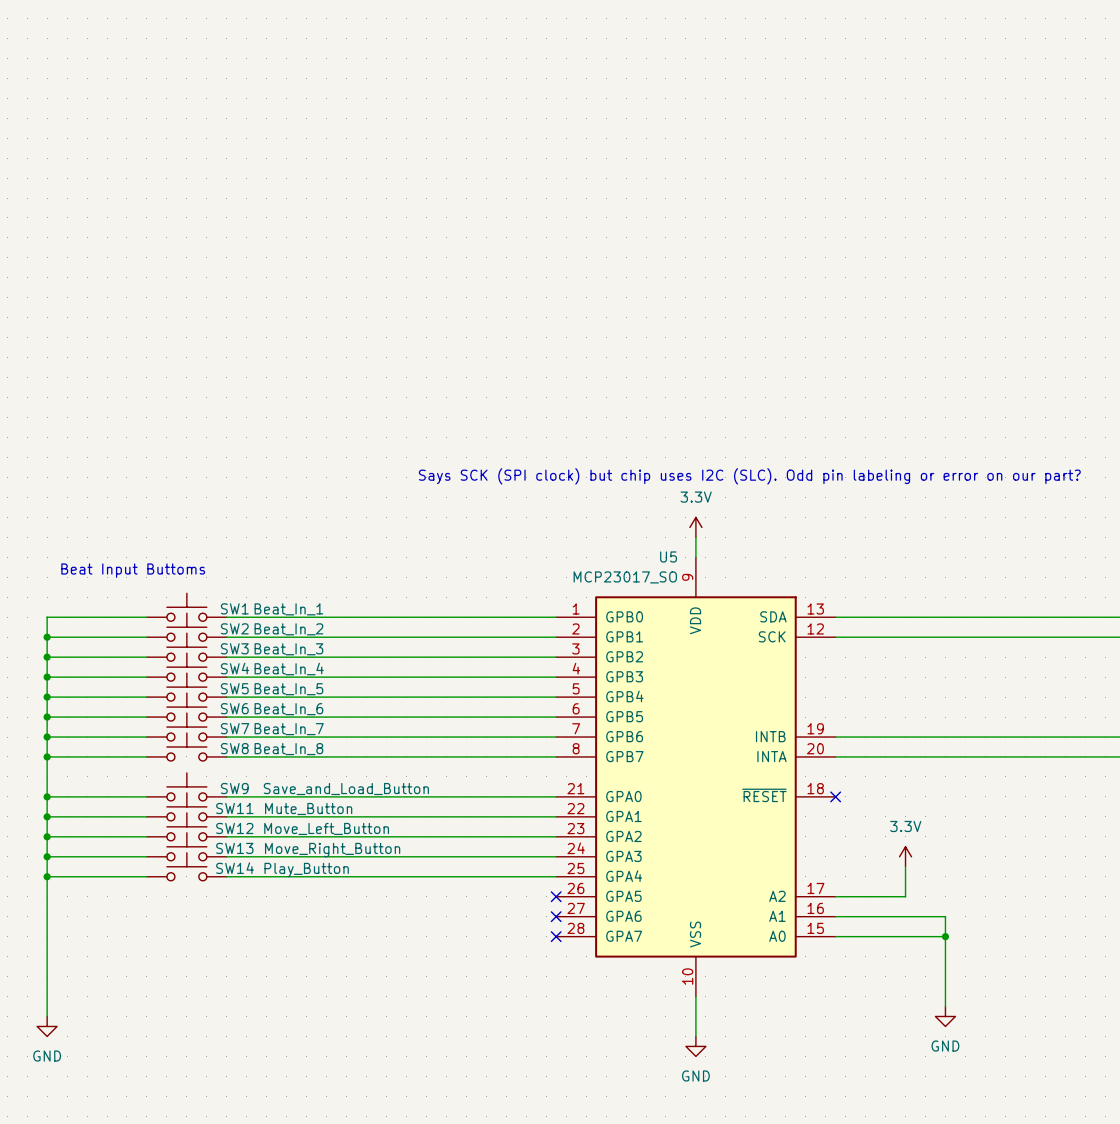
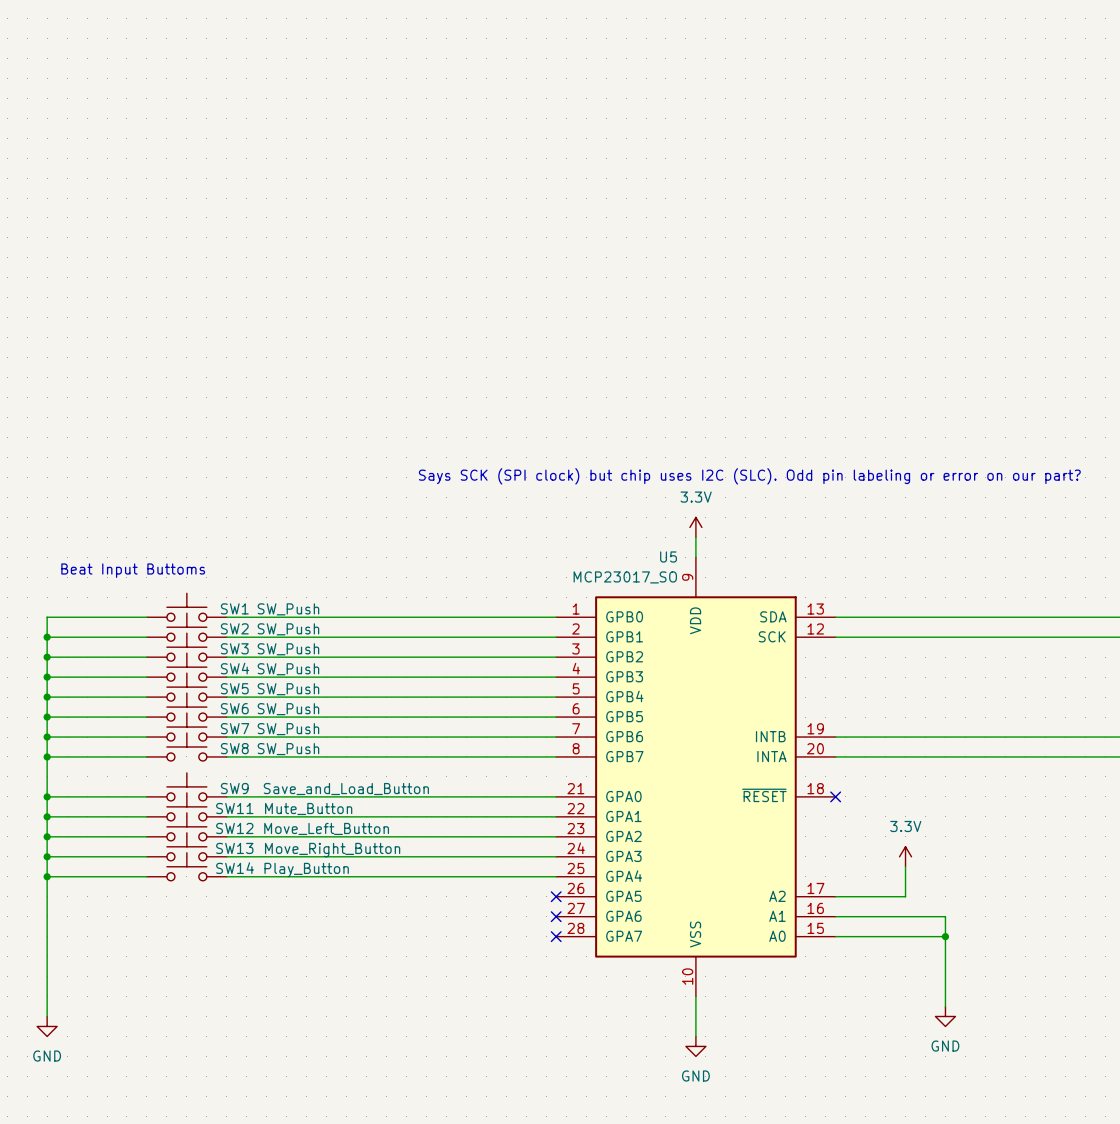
SW1 value: Beat_In_1 (288, 609) -> SW_Push (288, 609)
SW2 value: Beat_In_2 (288, 629) -> SW_Push (288, 629)
SW3 value: Beat_In_3 (288, 649) -> SW_Push (288, 649)
SW4 value: Beat_In_4 (289, 669) -> SW_Push (288, 669)
SW5 value: Beat_In_5 (288, 689) -> SW_Push (288, 689)
SW6 value: Beat_In_6 (288, 709) -> SW_Push (288, 709)
SW7 value: Beat_In_7 (289, 729) -> SW_Push (288, 729)
SW8 value: Beat_In_8 (288, 749) -> SW_Push (288, 749)

